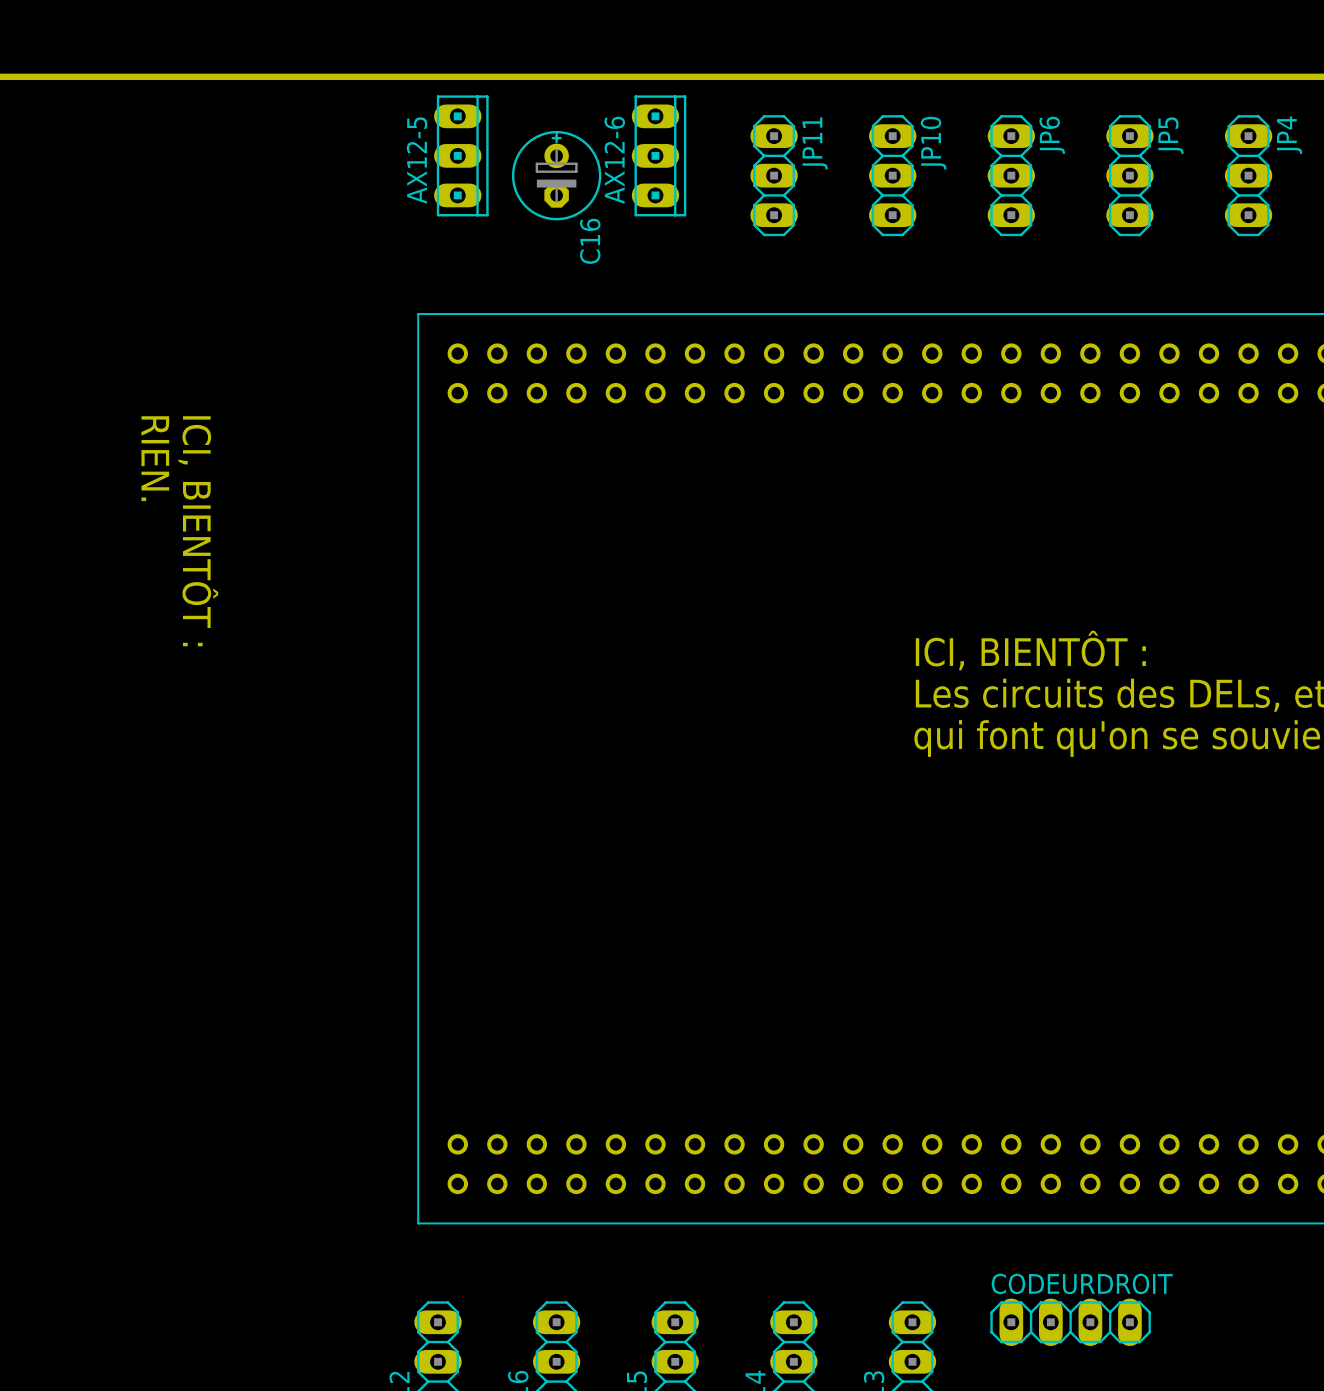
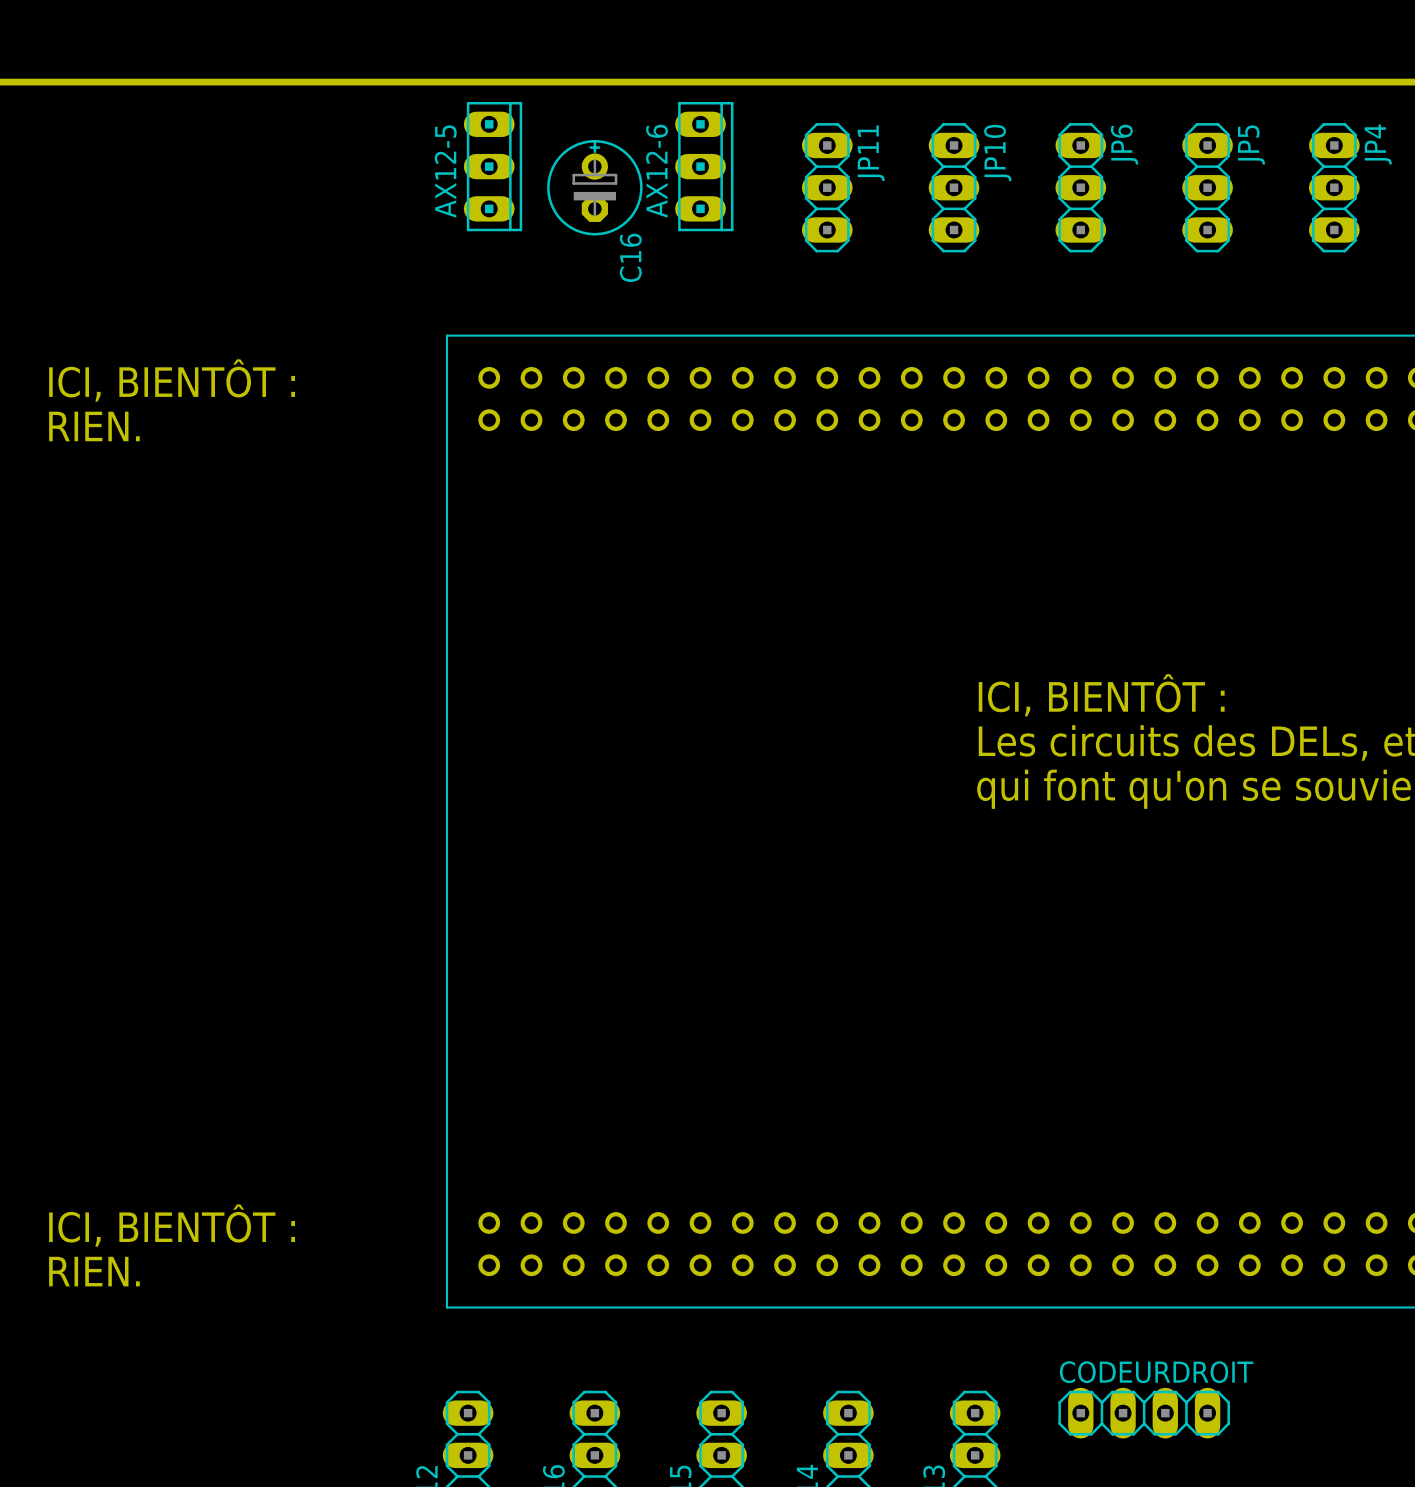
text rotation: 0° (155, 458) -> 90° counterclockwise (94, 426)
text rotation: 0° (198, 531) -> 90° counterclockwise (172, 380)
text: none -> ICI, BIENTÔT : (172, 1225)
text: none -> RIEN. (94, 1271)

